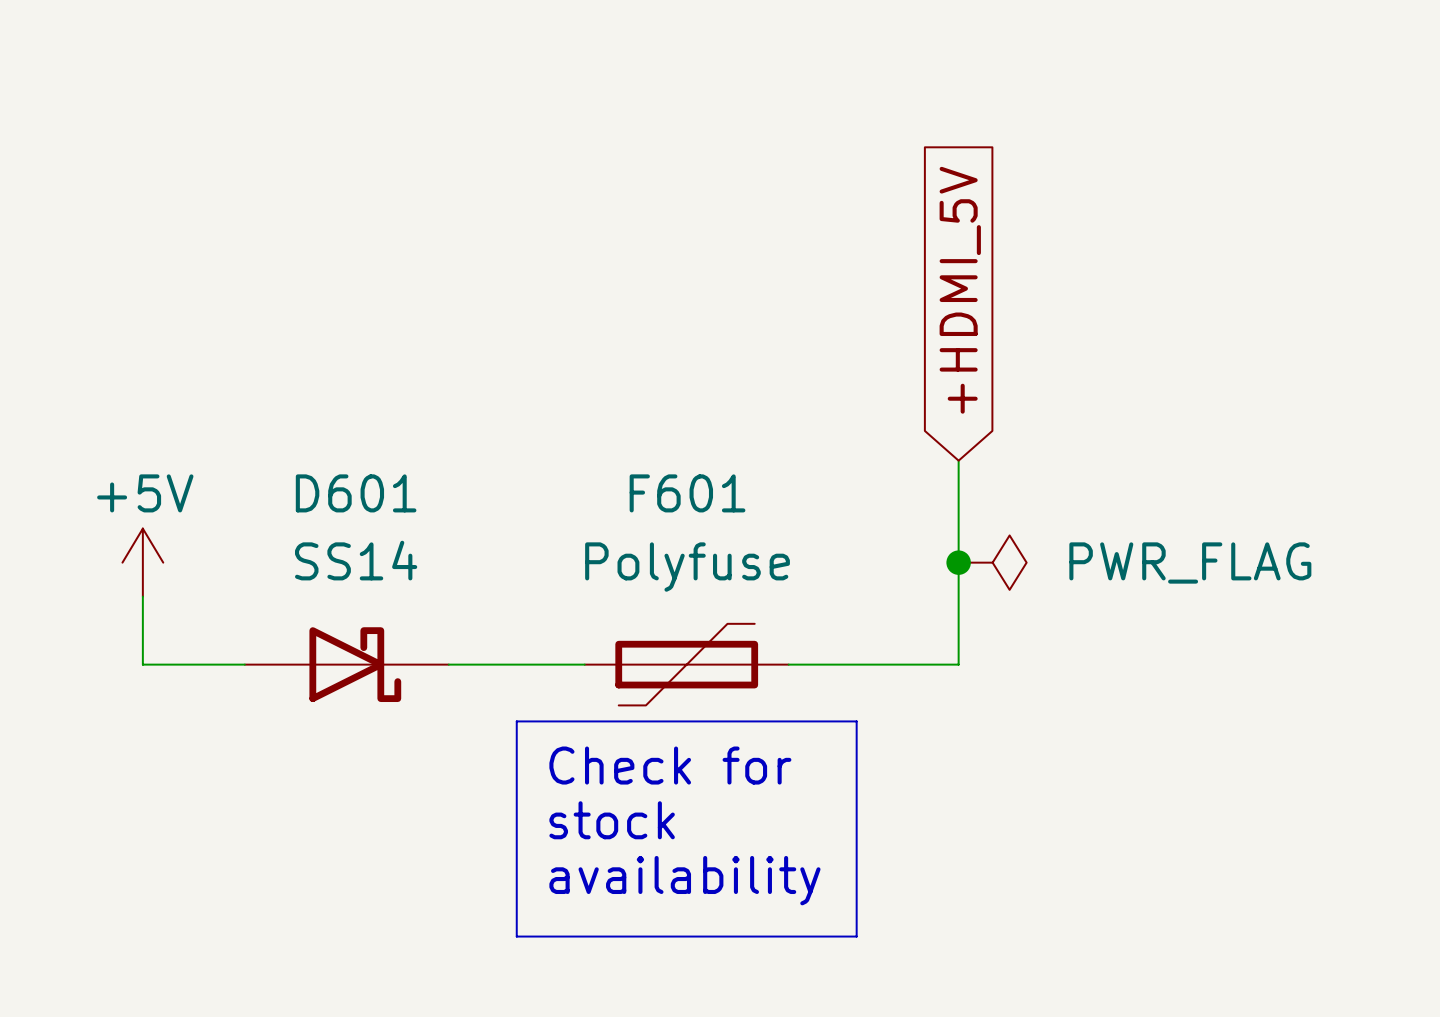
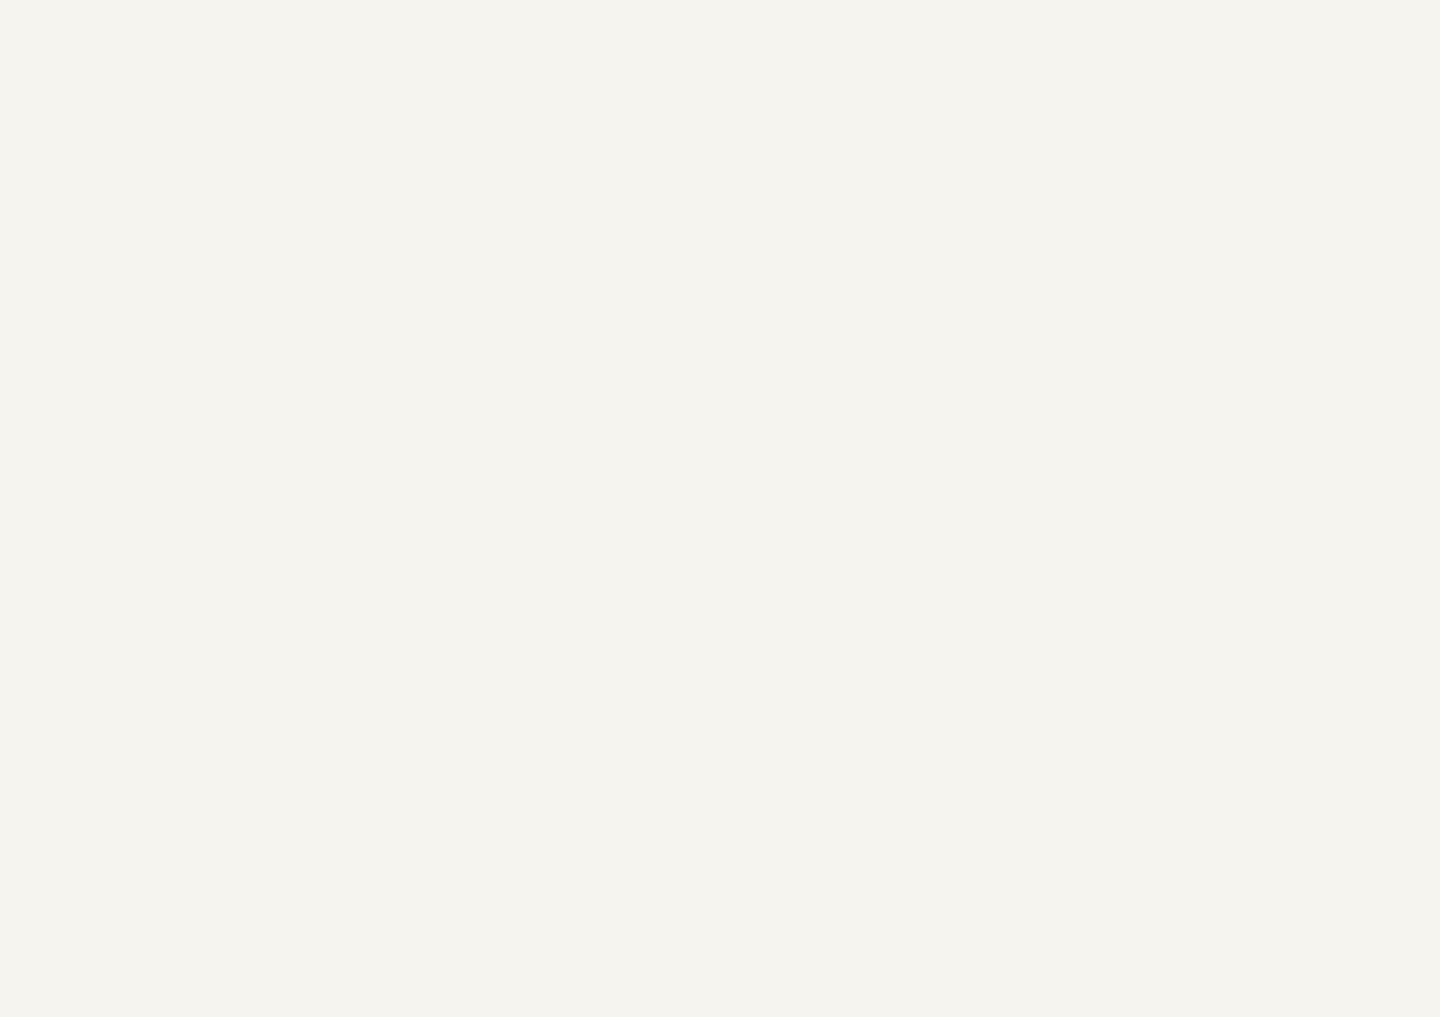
global label: +HDMI_5V (960, 290) -> none
wire: (958, 460) (958, 664) (788, 664) -> none
power symbol: +5V (142, 562) -> none
junction: (958, 562) -> none
power symbol: PWR_FLAG (992, 562) -> none
wire: (142, 596) (142, 664) (244, 664) -> none
D601: SS14 (346, 664) -> none
wire: (448, 664) (584, 664) -> none
F601: Polyfuse (686, 664) -> none
line: (516, 721) (856, 721) (856, 936) (516, 936) (516, 721) -> none
text: Check for (670, 765) -> none
text: stock (612, 820) -> none
text: availability (684, 880) -> none

